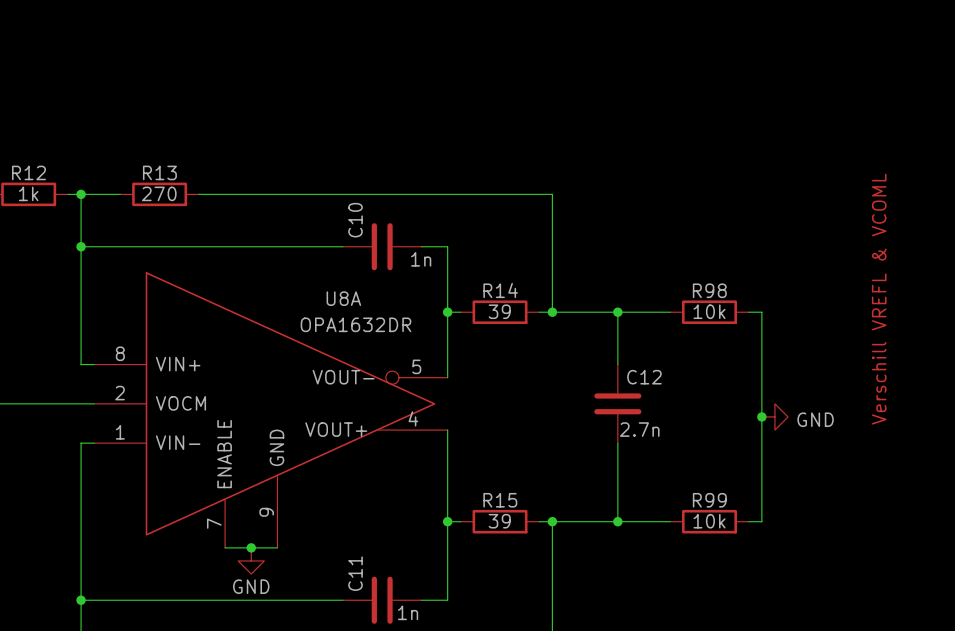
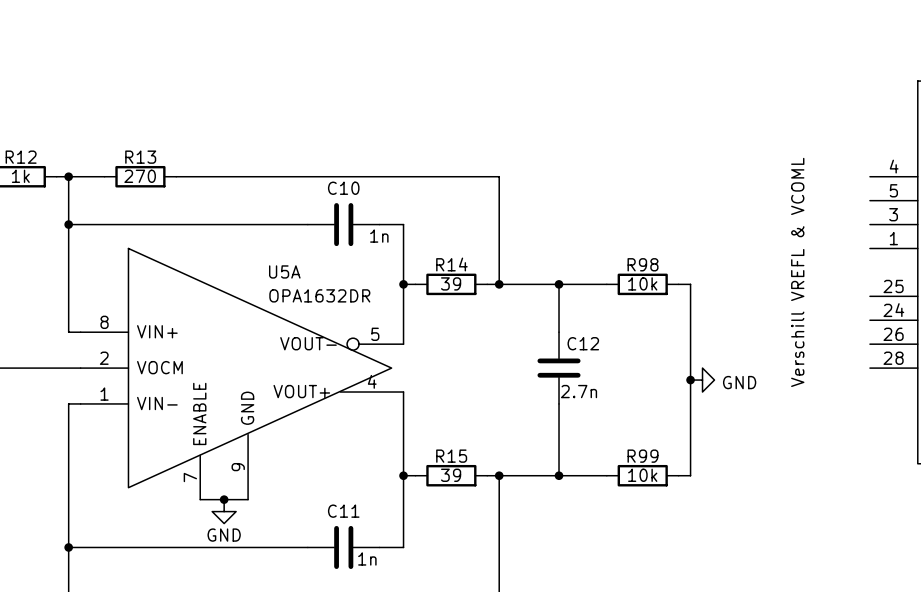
C10 name rotation: 0° (355, 220) -> 90° clockwise (343, 188)
U8A name: U8A (343, 298) -> U5A (284, 271)
C11 name rotation: 0° (355, 573) -> 90° clockwise (343, 511)

